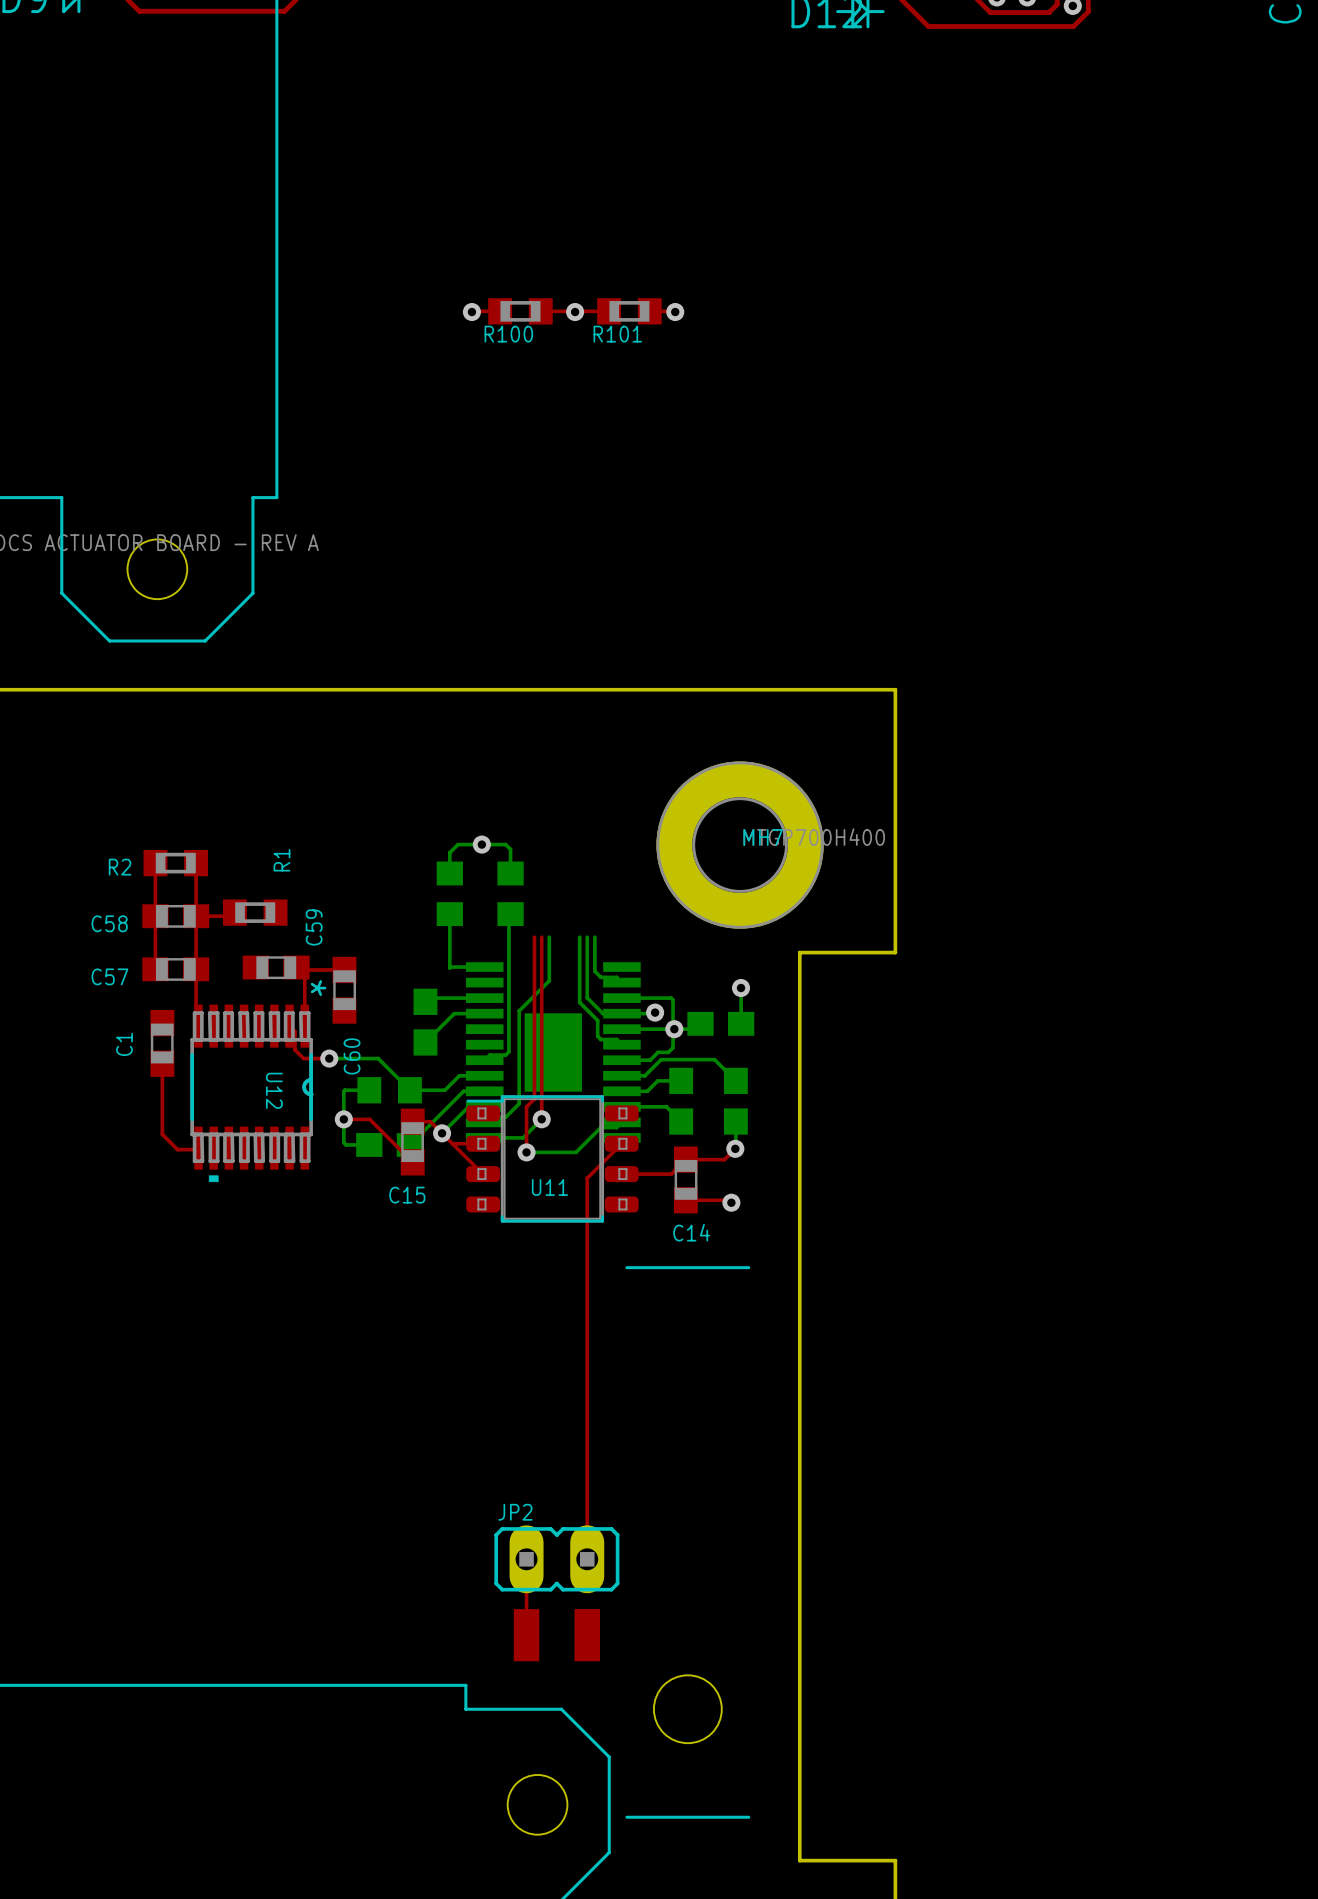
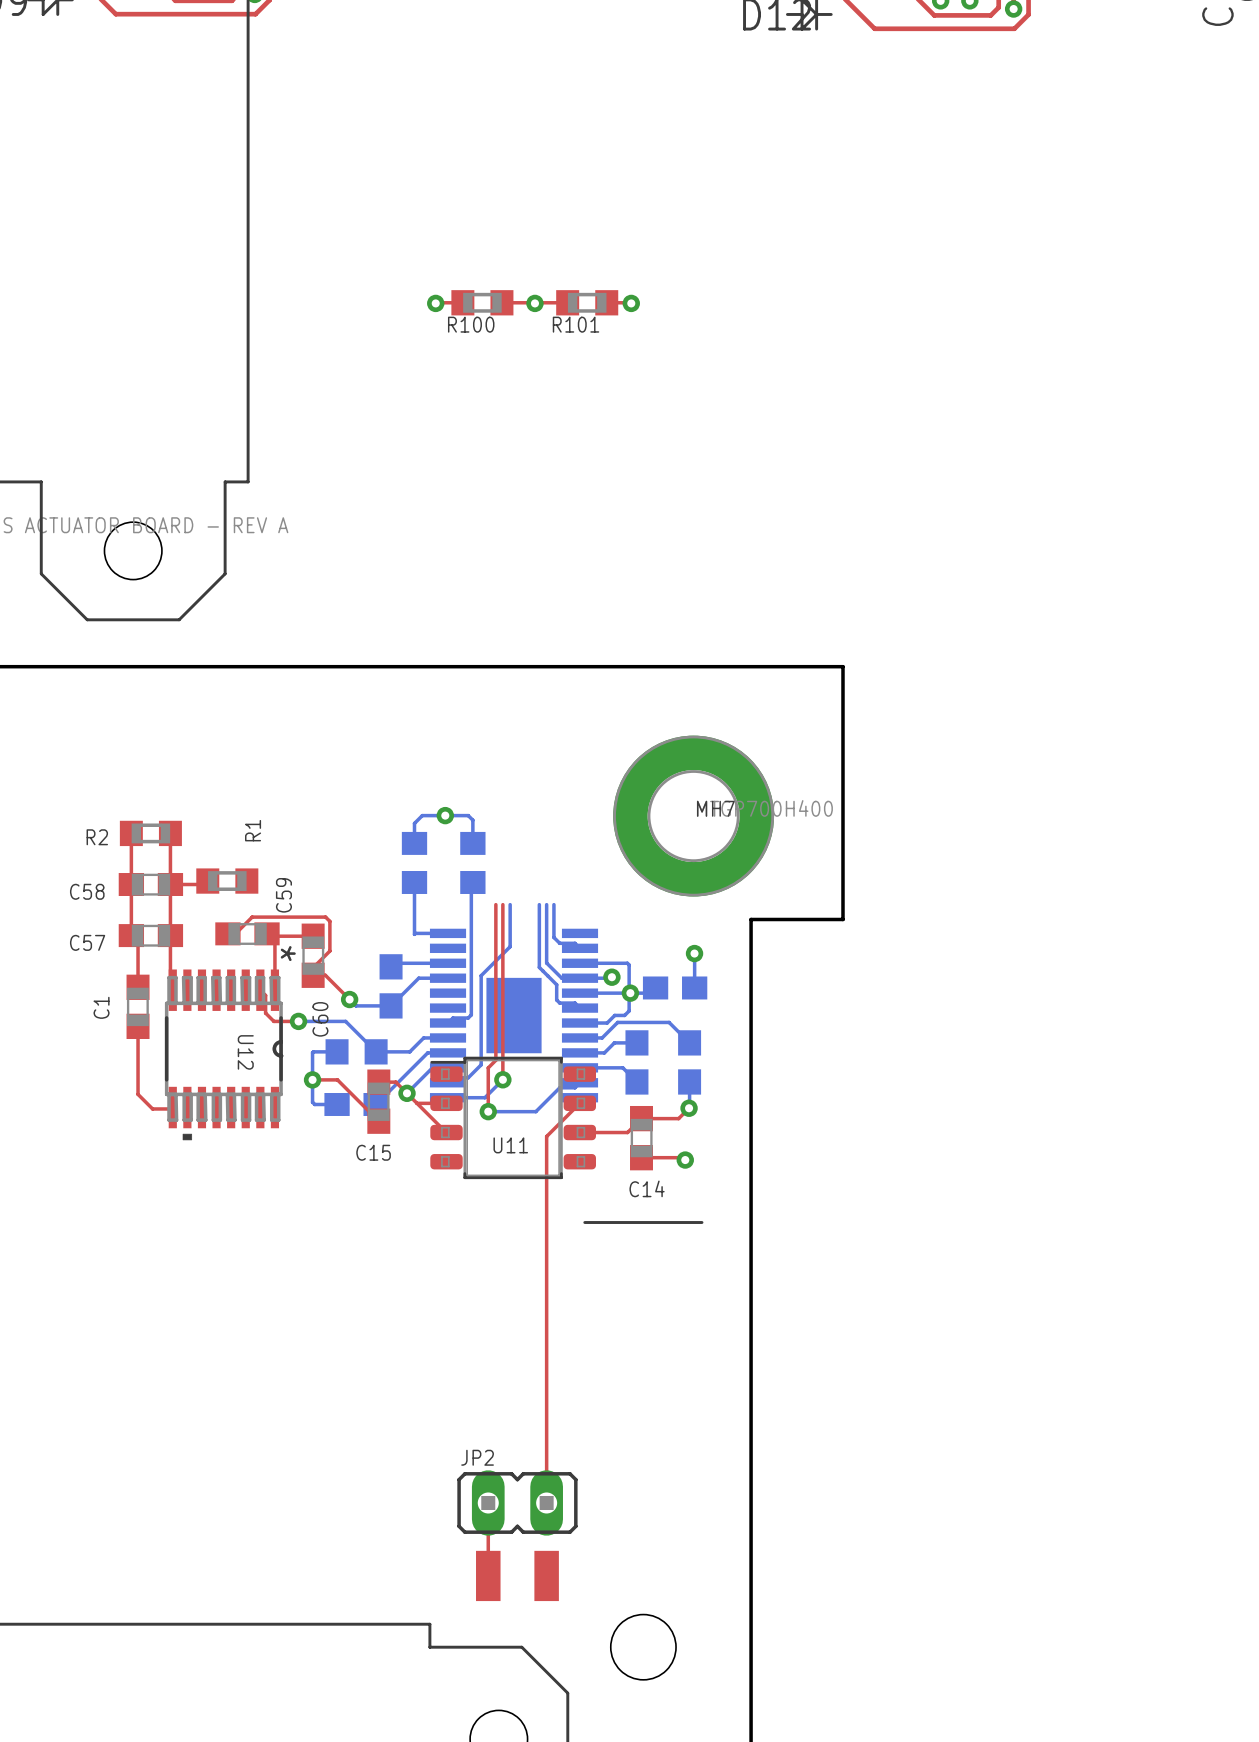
top track: none -> (227, 933) (235, 933) (252, 917) (325, 917) (329, 921) (329, 951) (313, 967) (313, 975) (325, 975) (349, 999)
top track: none -> (131, 935) (138, 942) (138, 987)
bottom track: none -> (349, 999) (356, 1005) (391, 1005)
via: none -> (349, 999)

